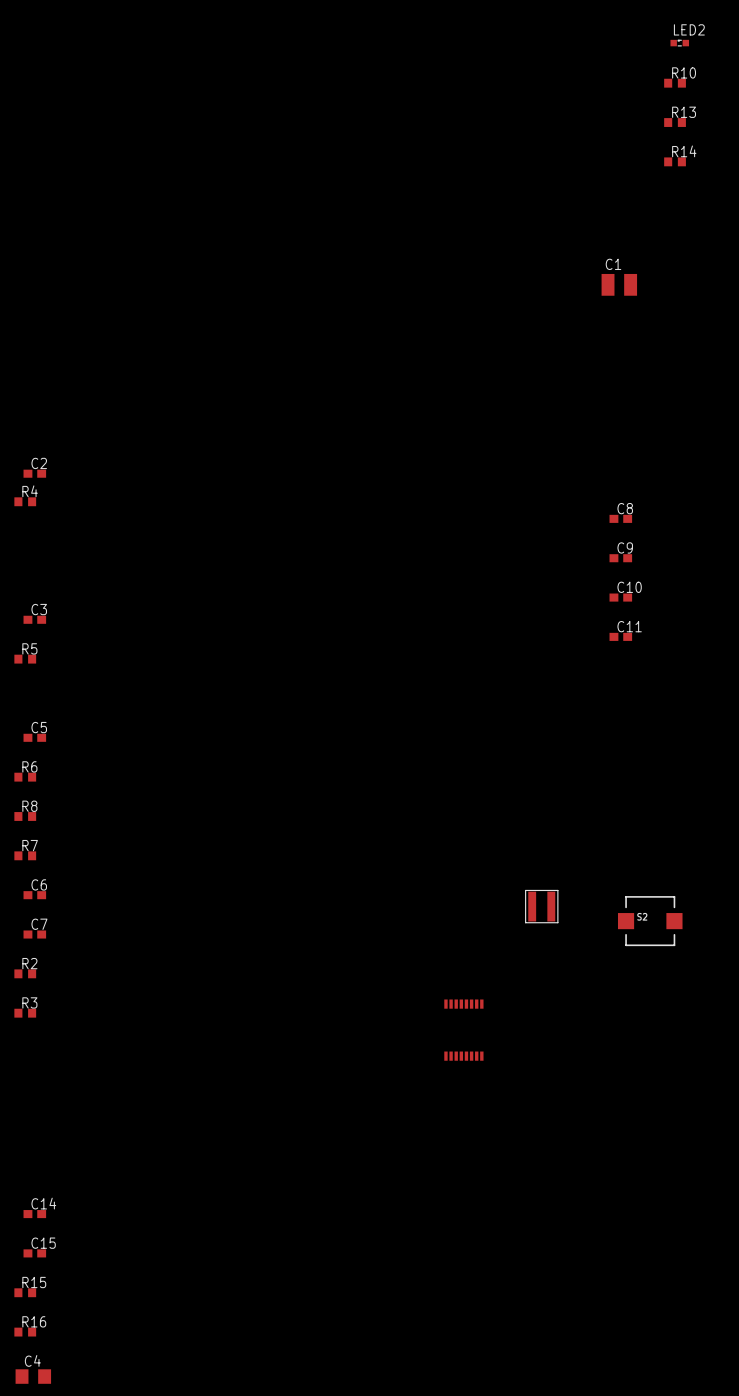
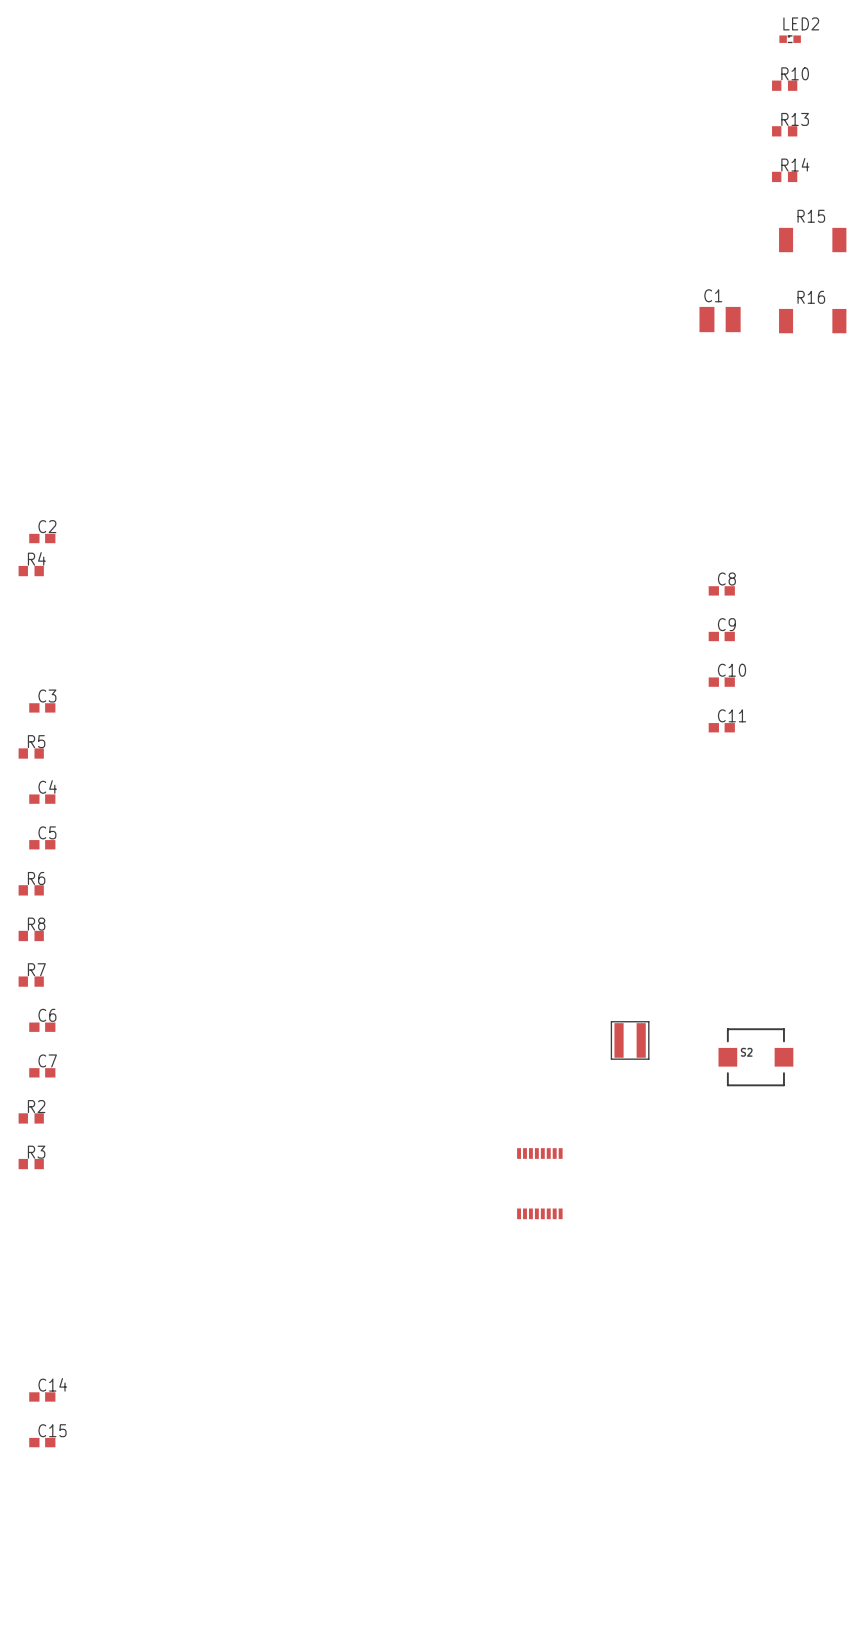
R15 footprint: [14, 1288, 37, 1298] -> [779, 227, 847, 253]
R16 footprint: [14, 1327, 37, 1337] -> [779, 308, 847, 334]
C4 footprint: [15, 1369, 52, 1384] -> [29, 794, 56, 804]

